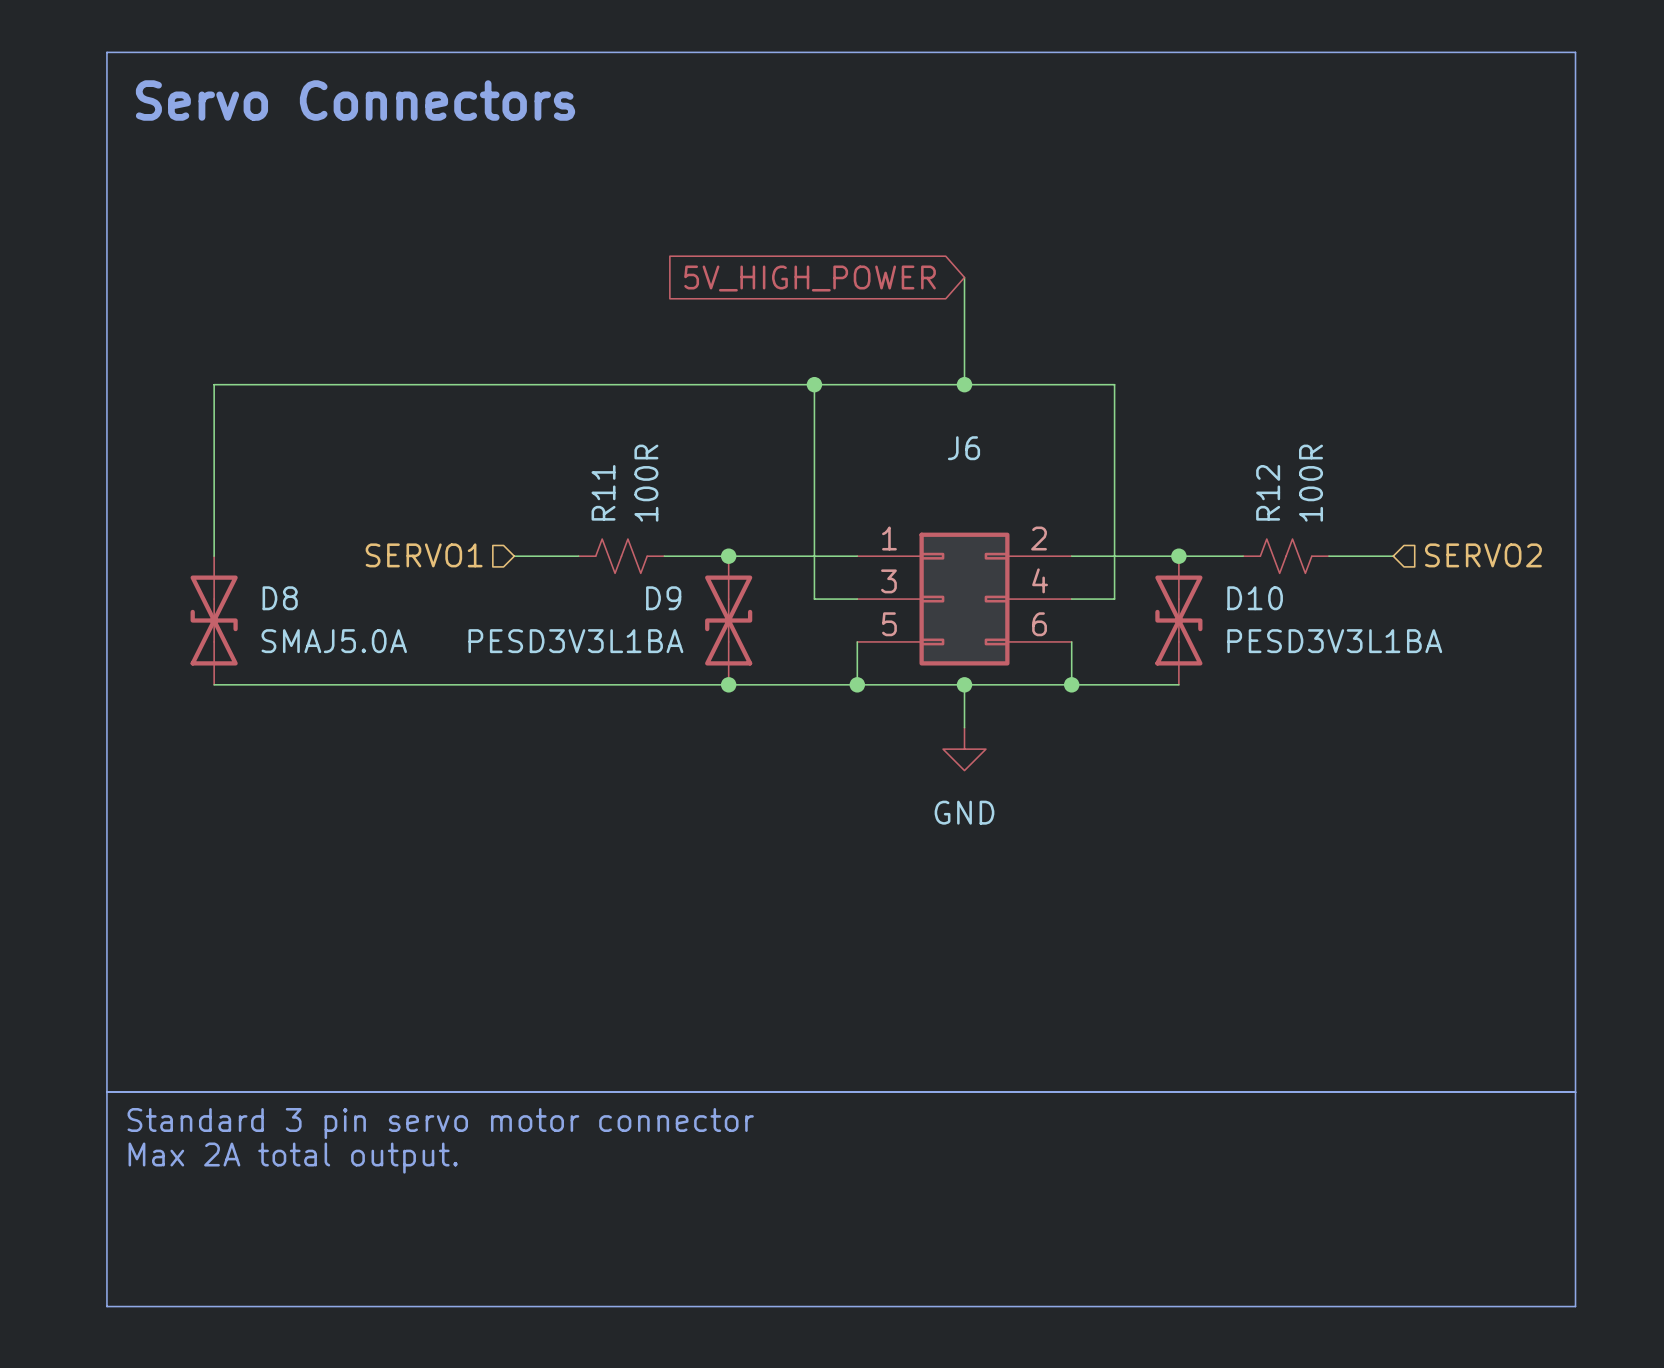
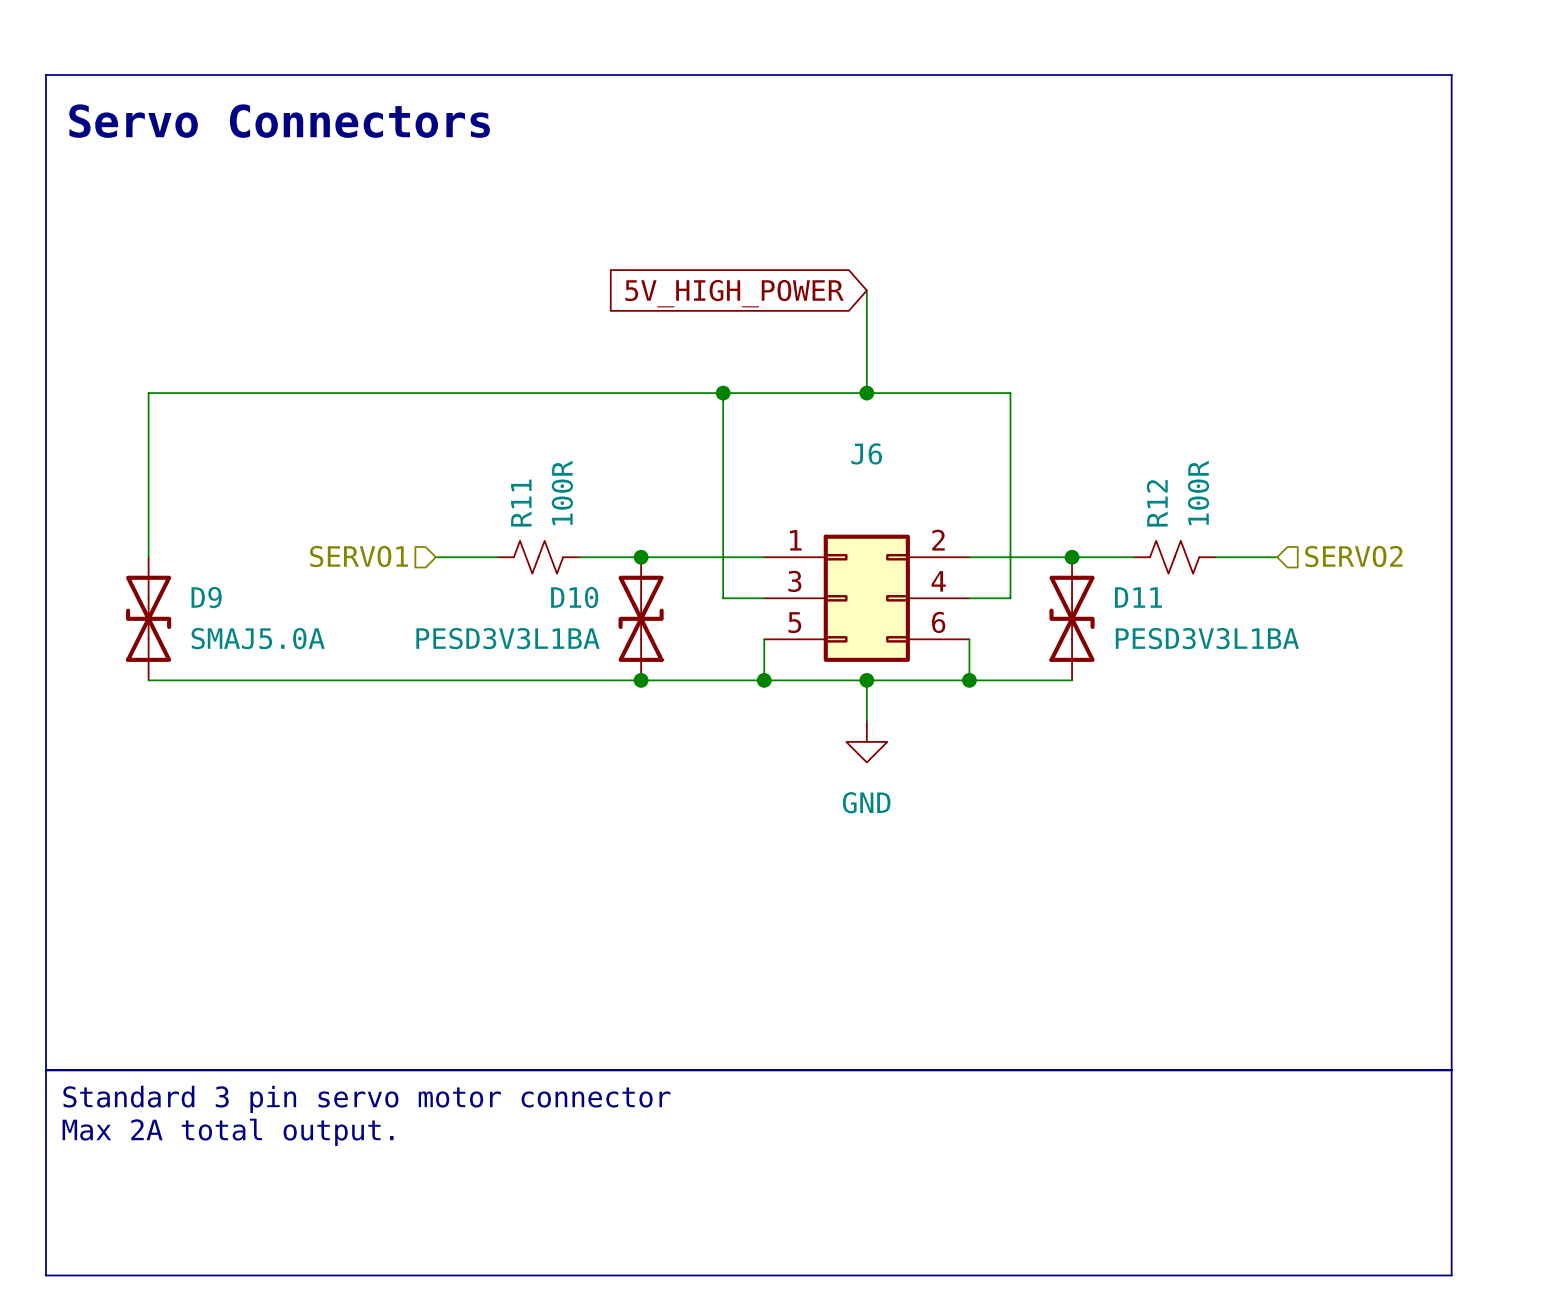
D8 name: D8 (280, 598) -> D9 (206, 597)
D9 name: D9 (663, 598) -> D10 (574, 597)
D10 name: D10 (1255, 598) -> D11 (1138, 597)

